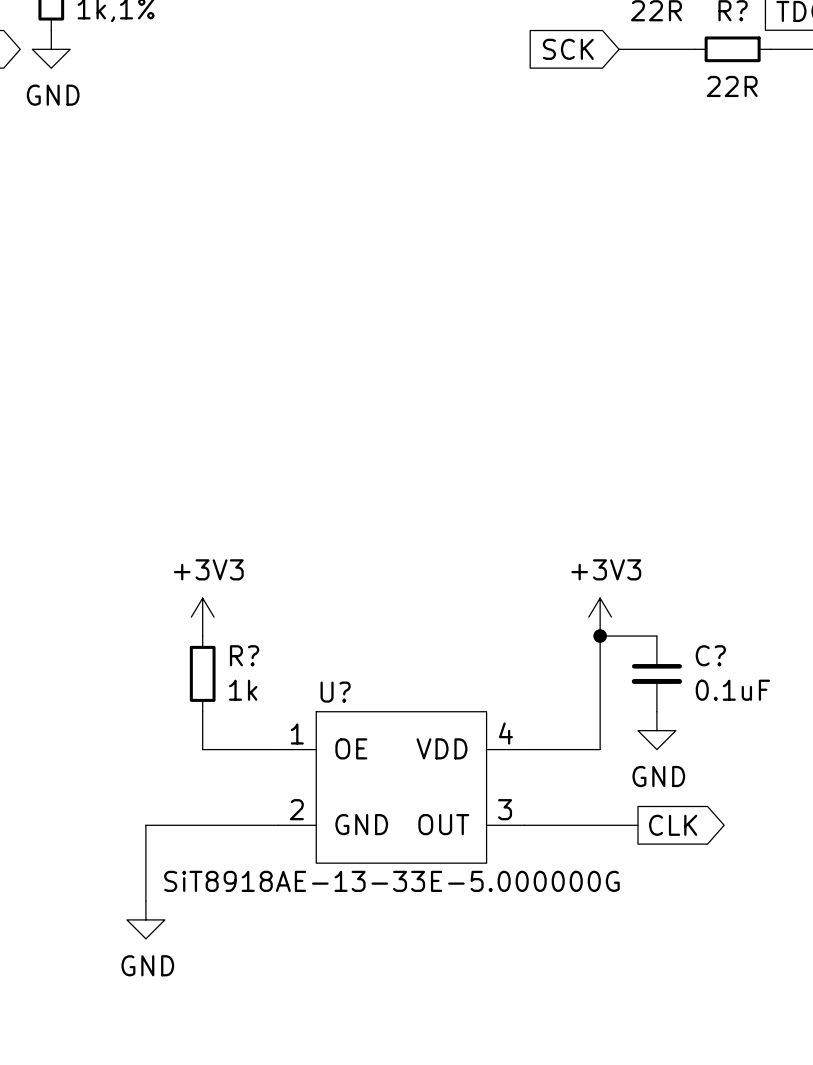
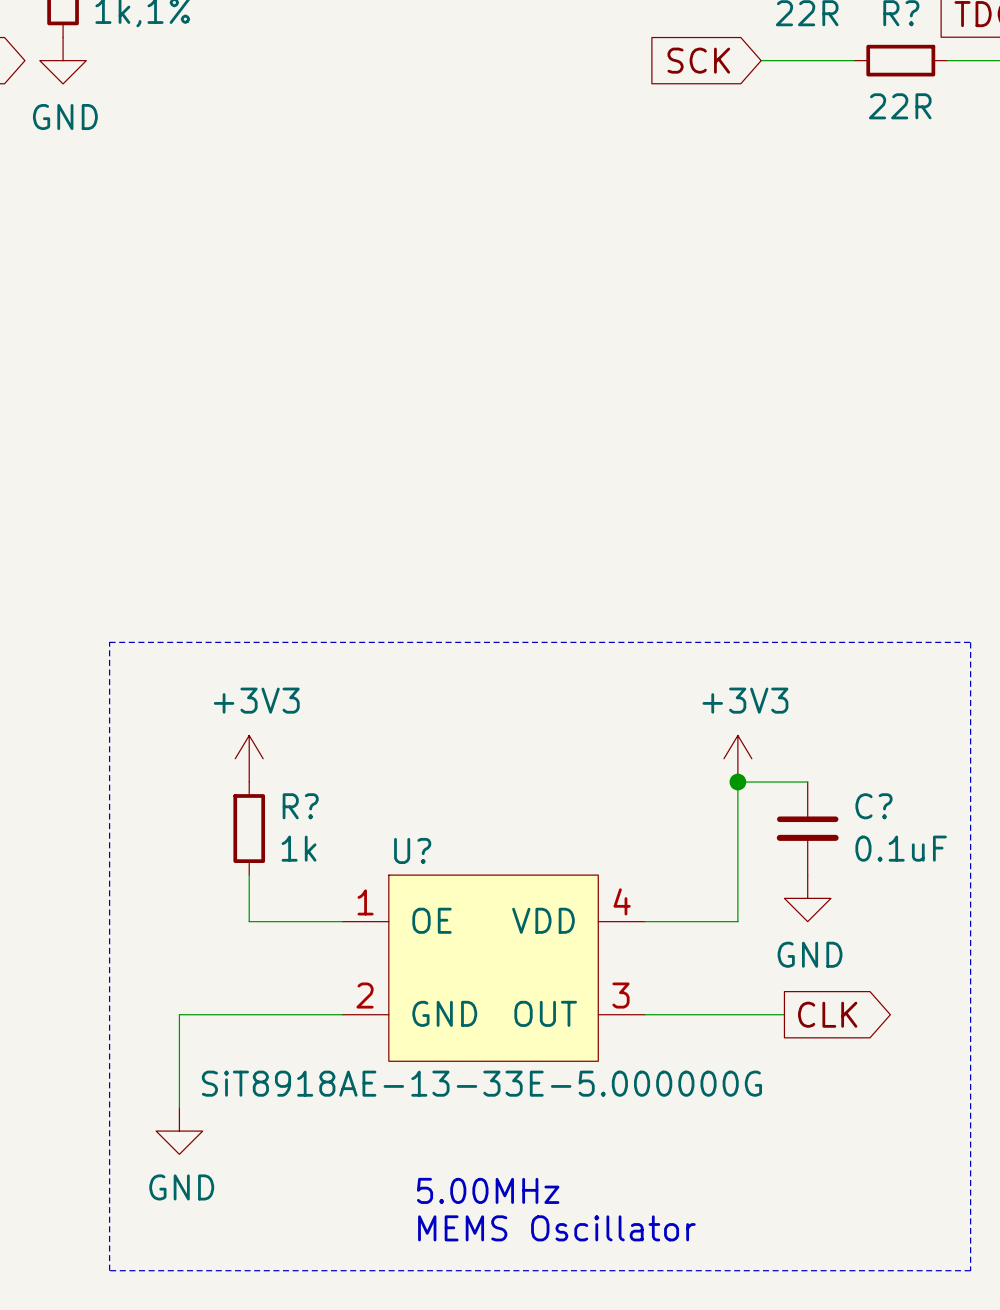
line: none -> (109, 642) (109, 1270) (970, 1270) (970, 642) (109, 642)
text: none -> 5.00MHz (488, 1190)
text: none -> MEMS Oscillator (556, 1228)

